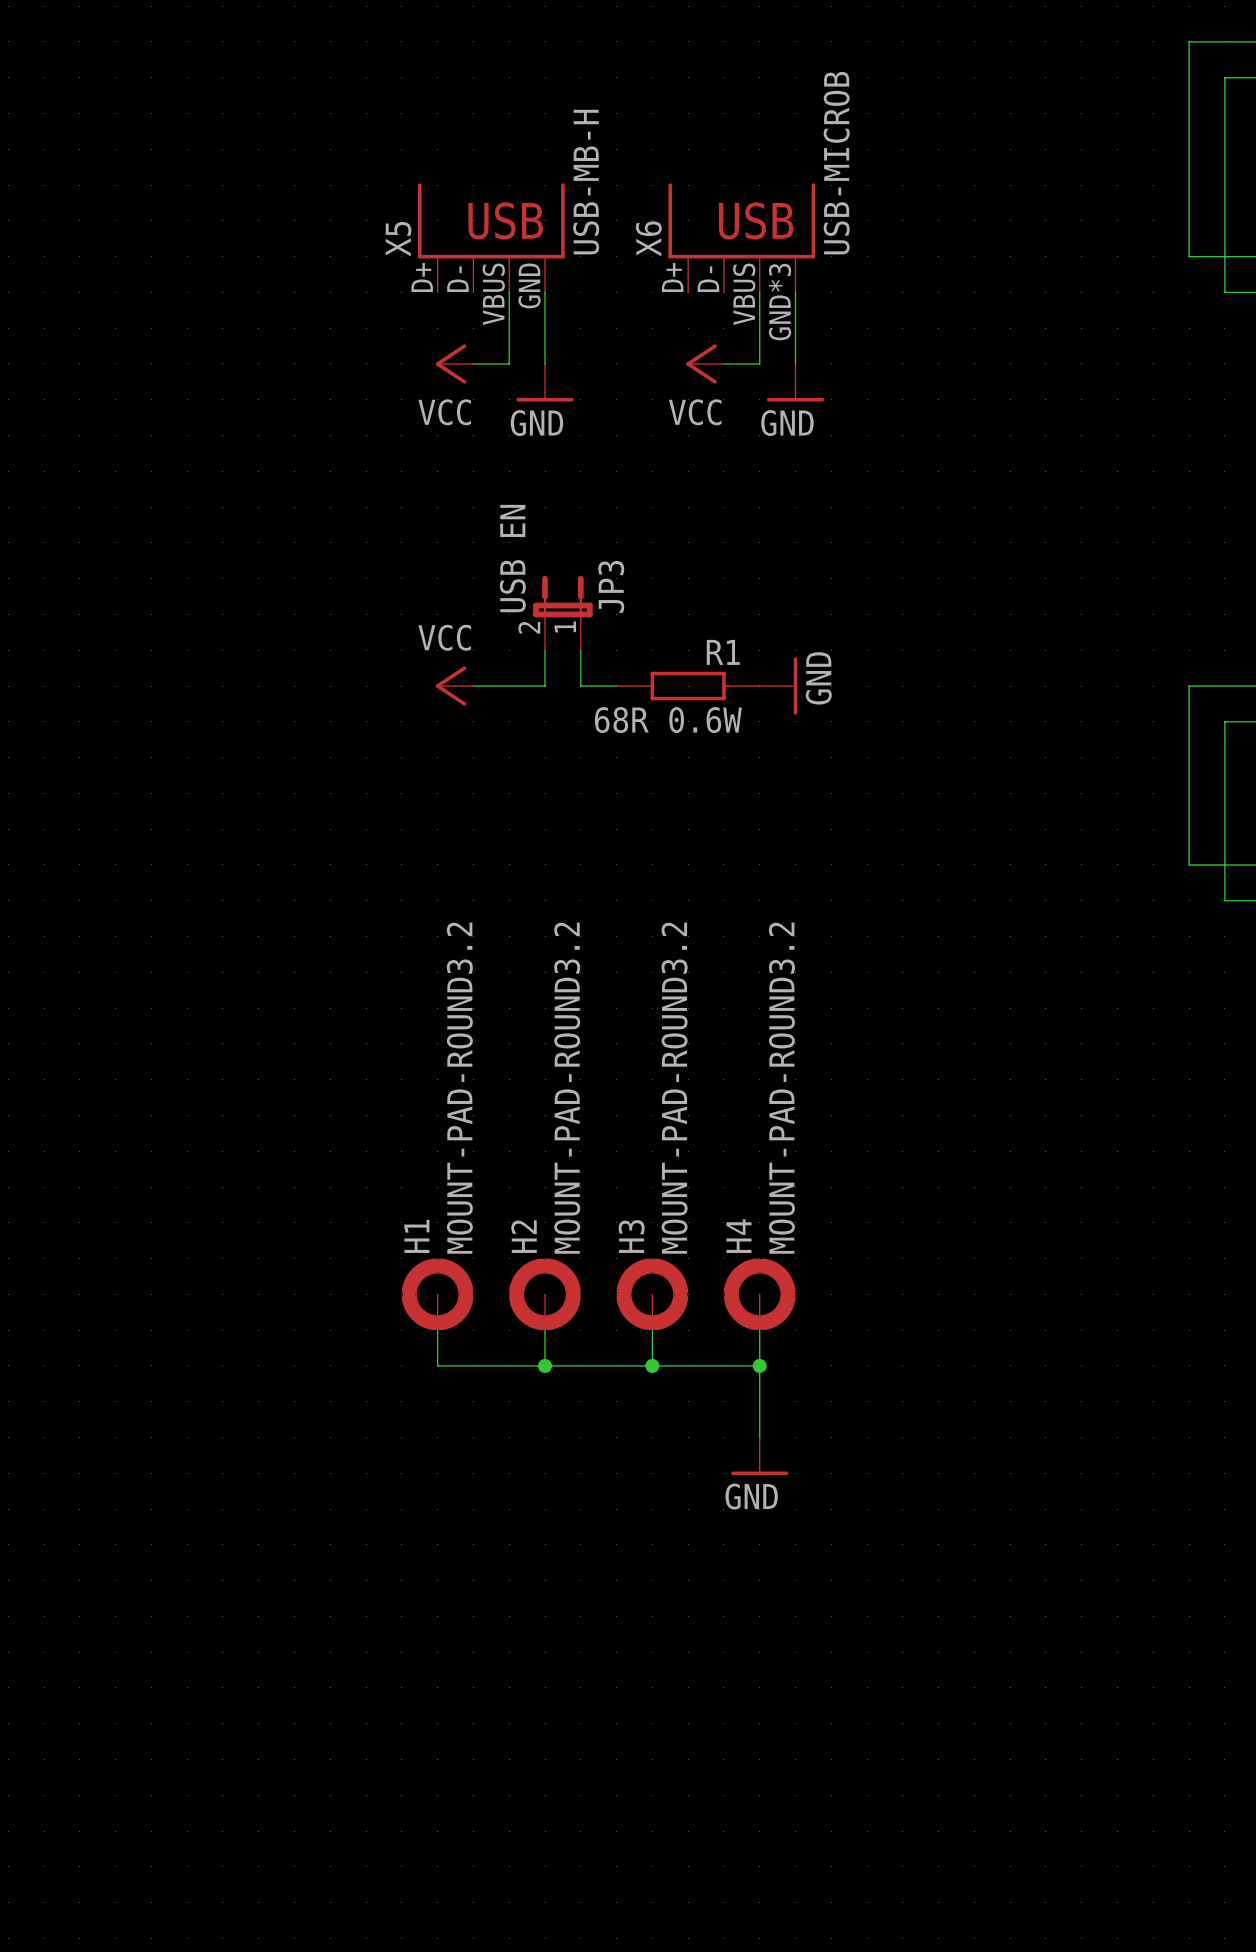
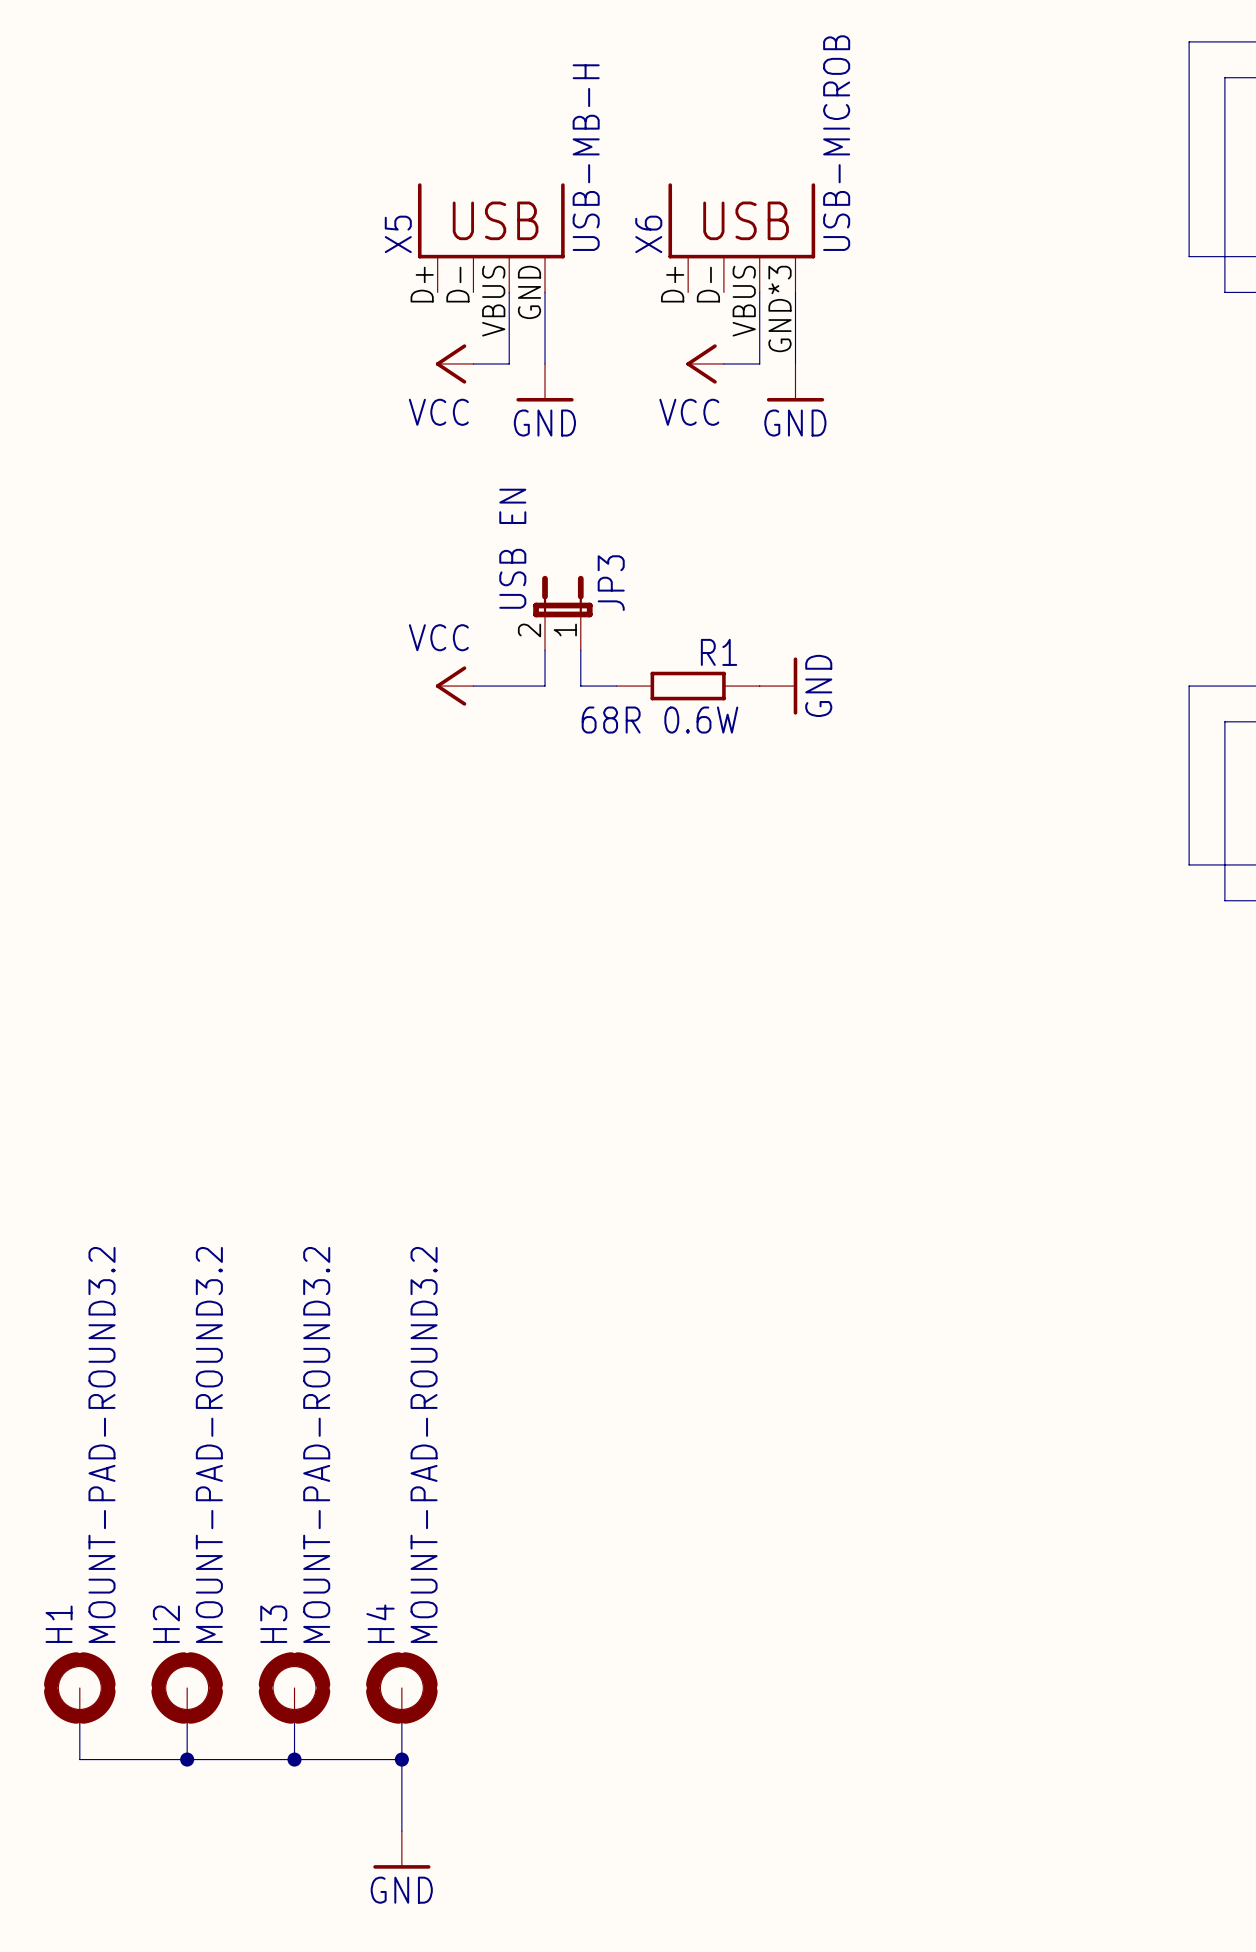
H1 position: (437, 1294) -> (79, 1687)
H2 position: (545, 1294) -> (187, 1687)
H3 position: (652, 1294) -> (294, 1687)
H4 position: (759, 1294) -> (401, 1687)
wire: (437, 1330) (437, 1365) (759, 1365) -> none
wire: (545, 1330) (545, 1365) -> none
wire: (652, 1330) (652, 1365) -> none
wire: (759, 1330) (759, 1437) -> none
junction: (545, 1365) -> none
junction: (652, 1365) -> none
junction: (759, 1365) -> none
power symbol: GND (759, 1456) -> none
wire: none -> (79, 1723) (79, 1759) (401, 1759)
wire: none -> (187, 1723) (187, 1759)
wire: none -> (294, 1723) (294, 1759)
wire: none -> (401, 1723) (401, 1831)
junction: none -> (187, 1759)
junction: none -> (294, 1759)
junction: none -> (401, 1759)
power symbol: none -> GND (401, 1849)

